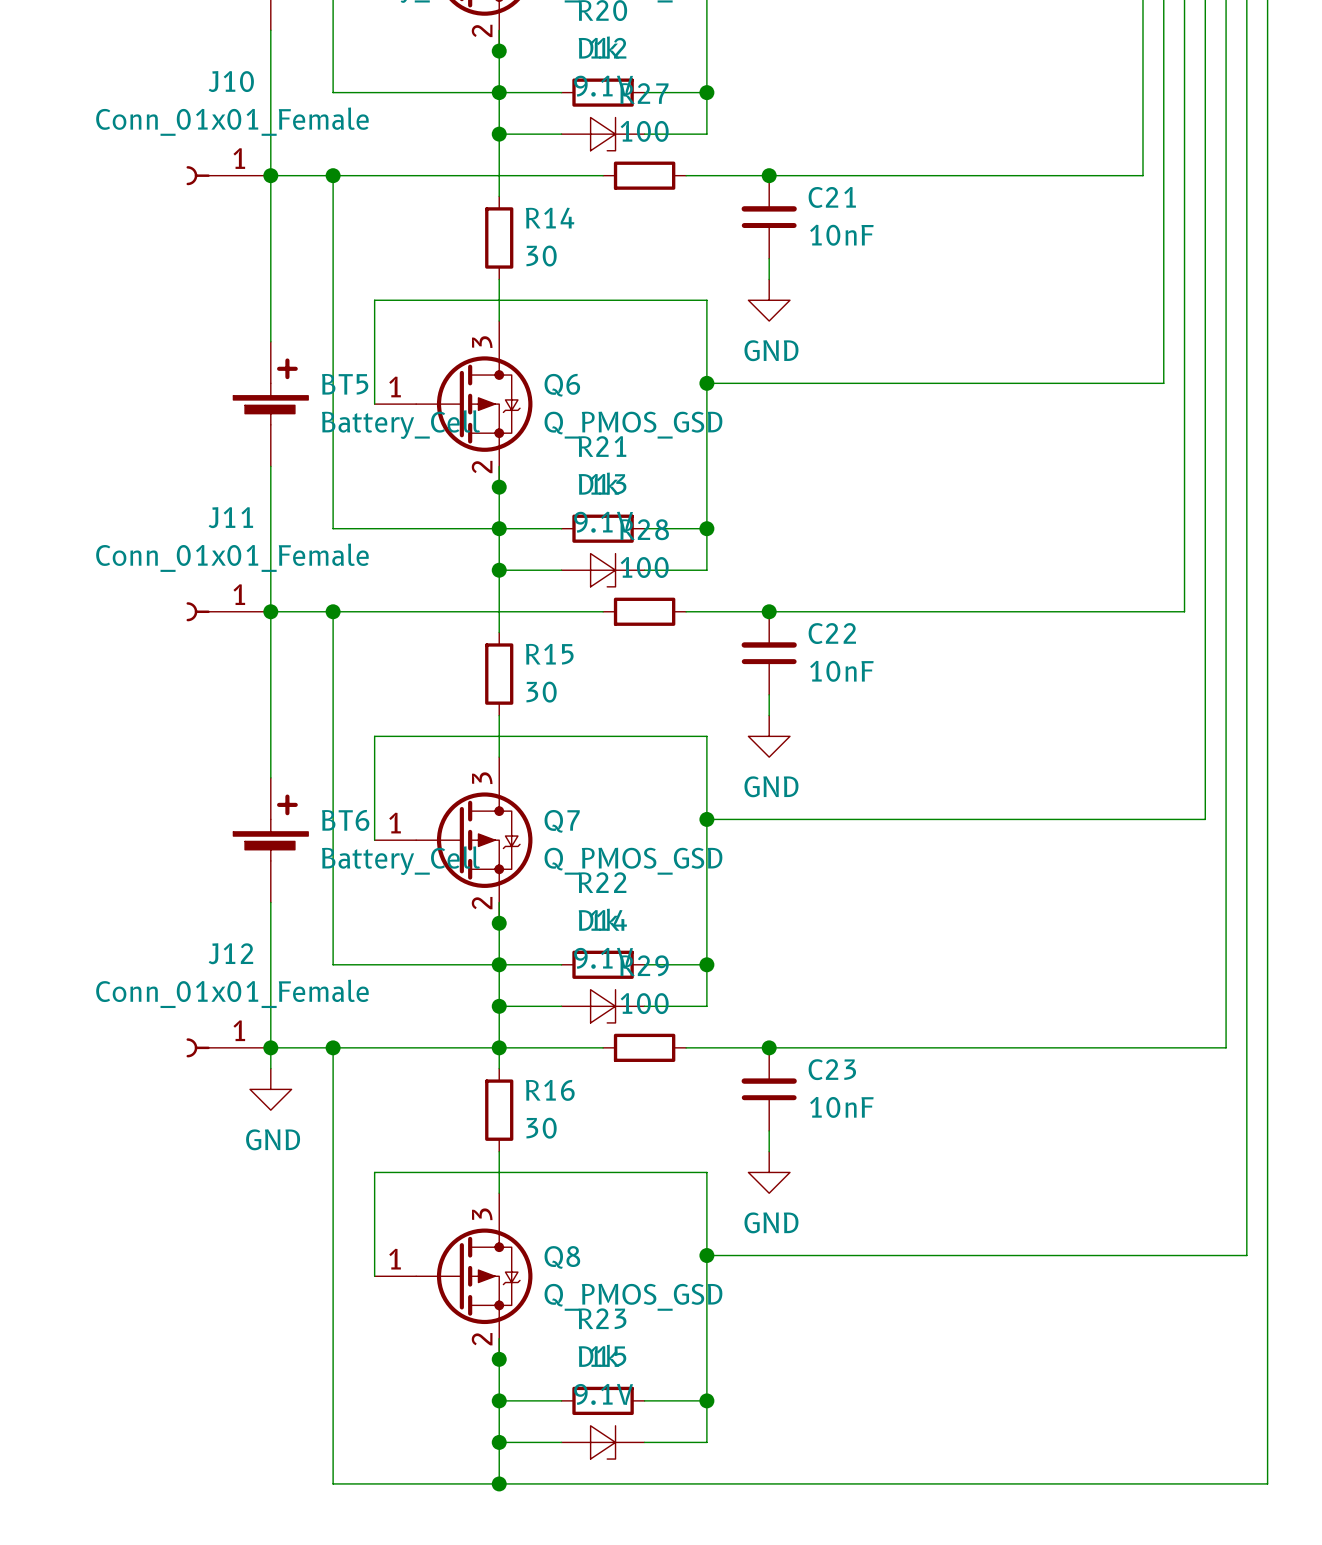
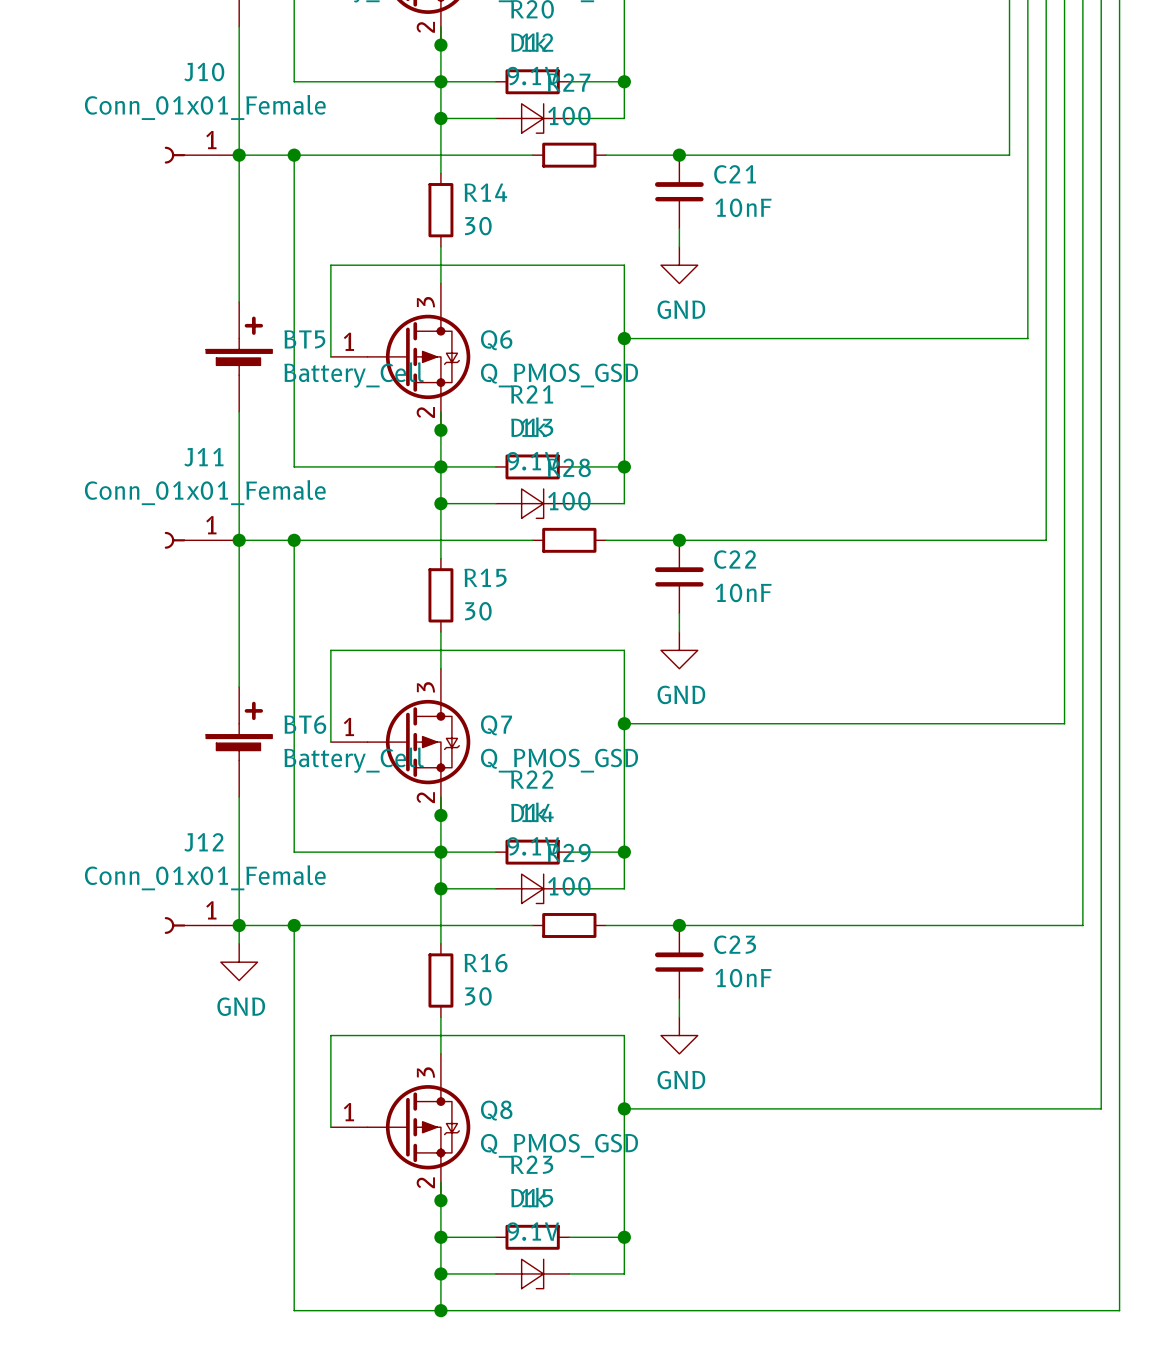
junction: (499, 1047) -> none

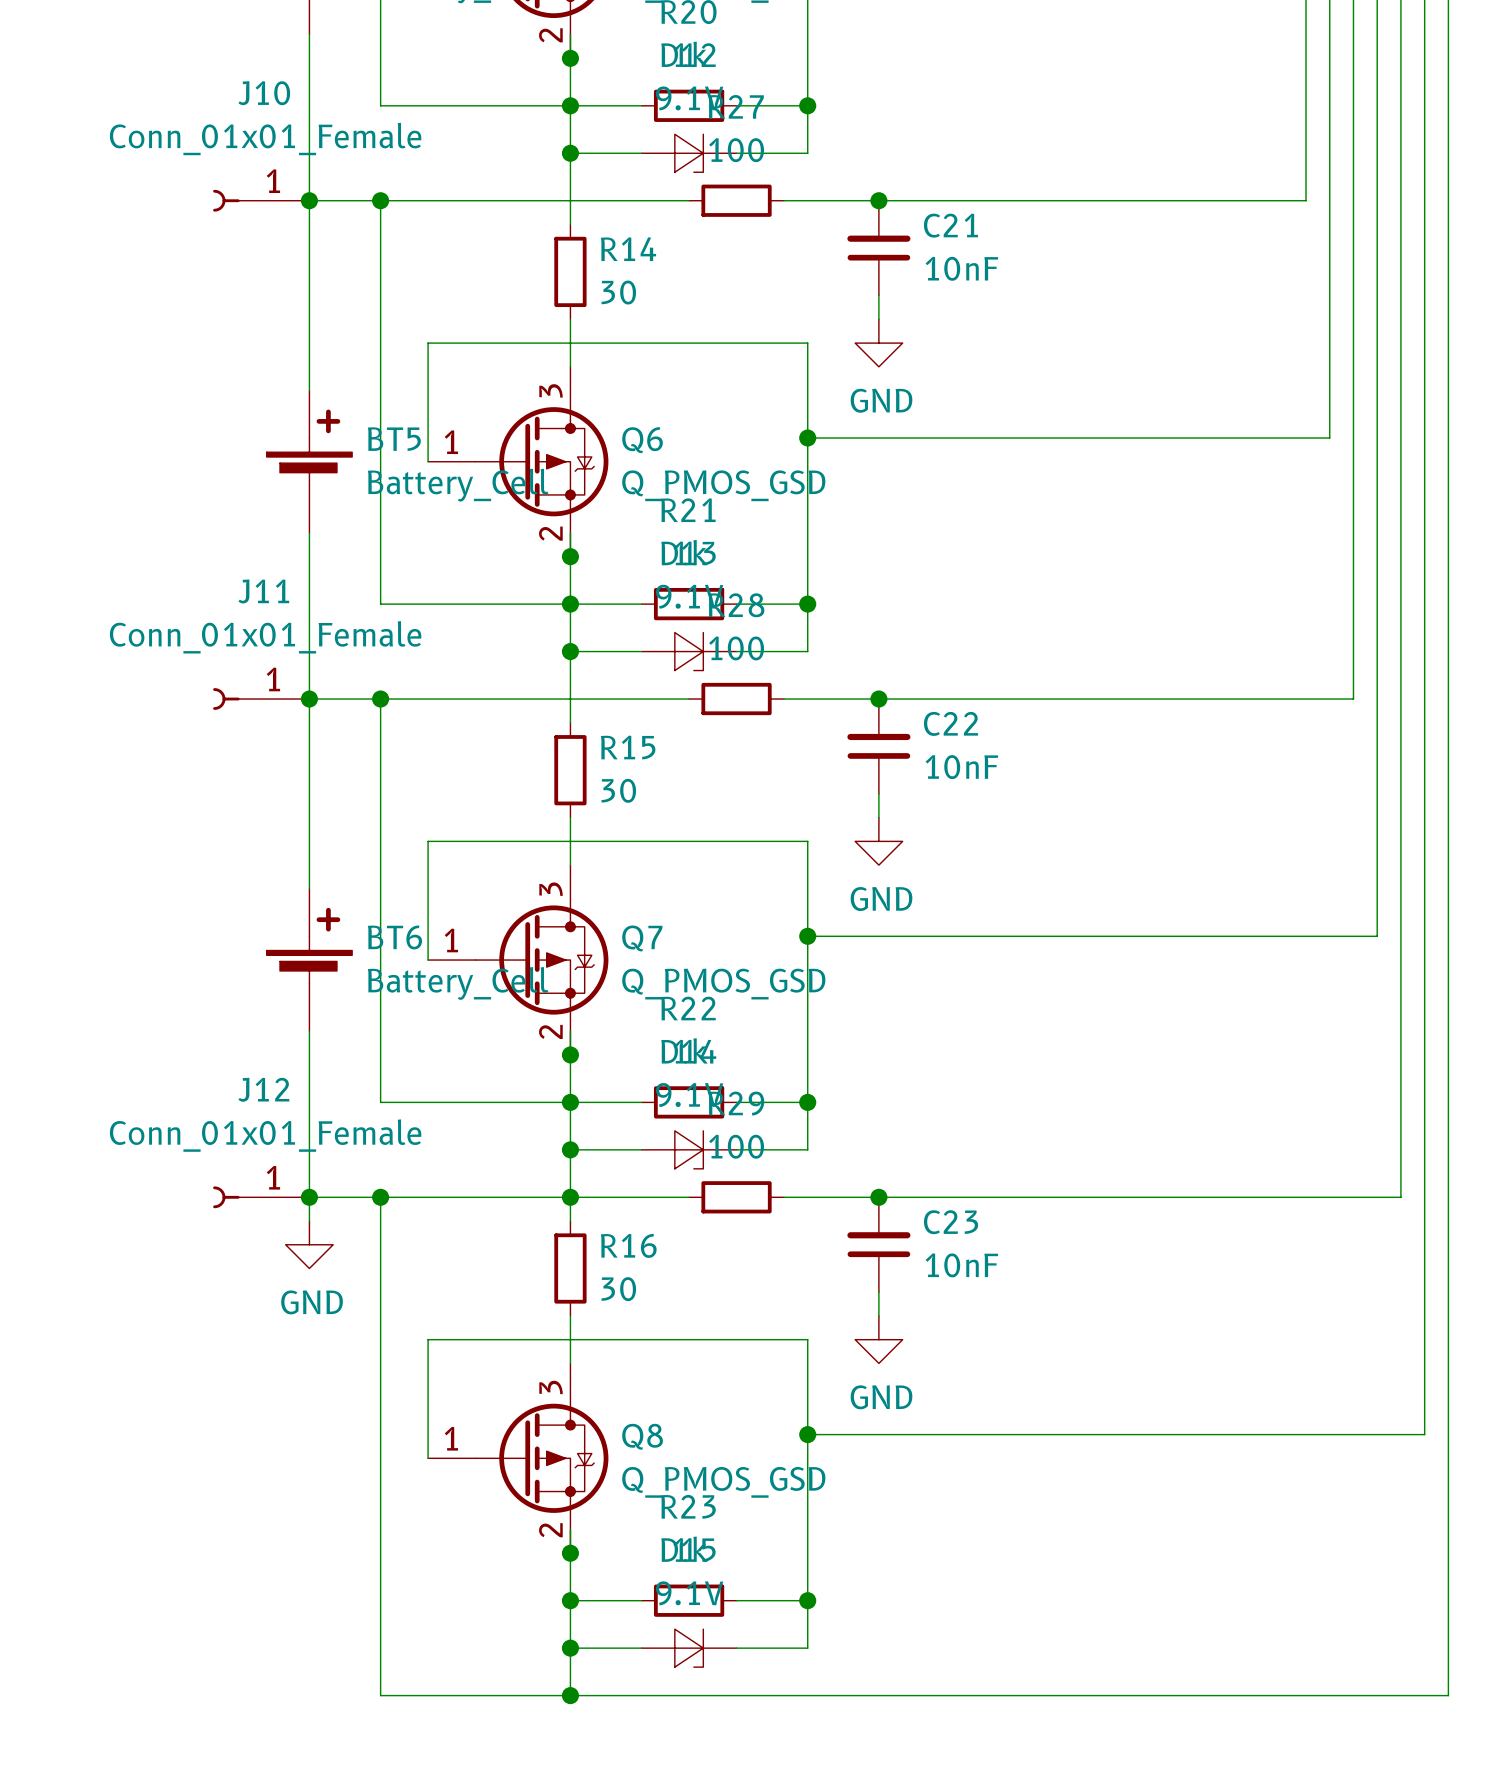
junction: none -> (570, 1197)

